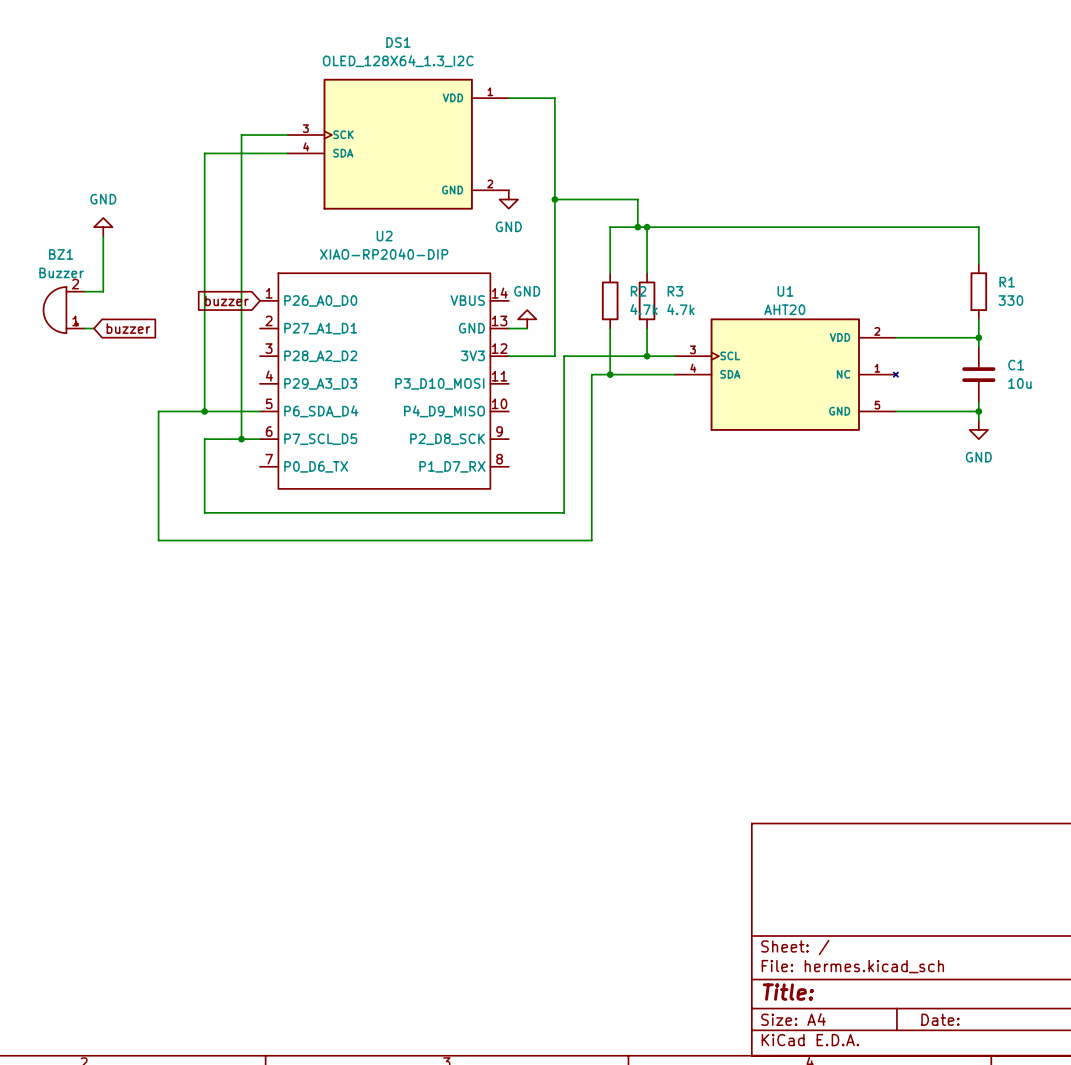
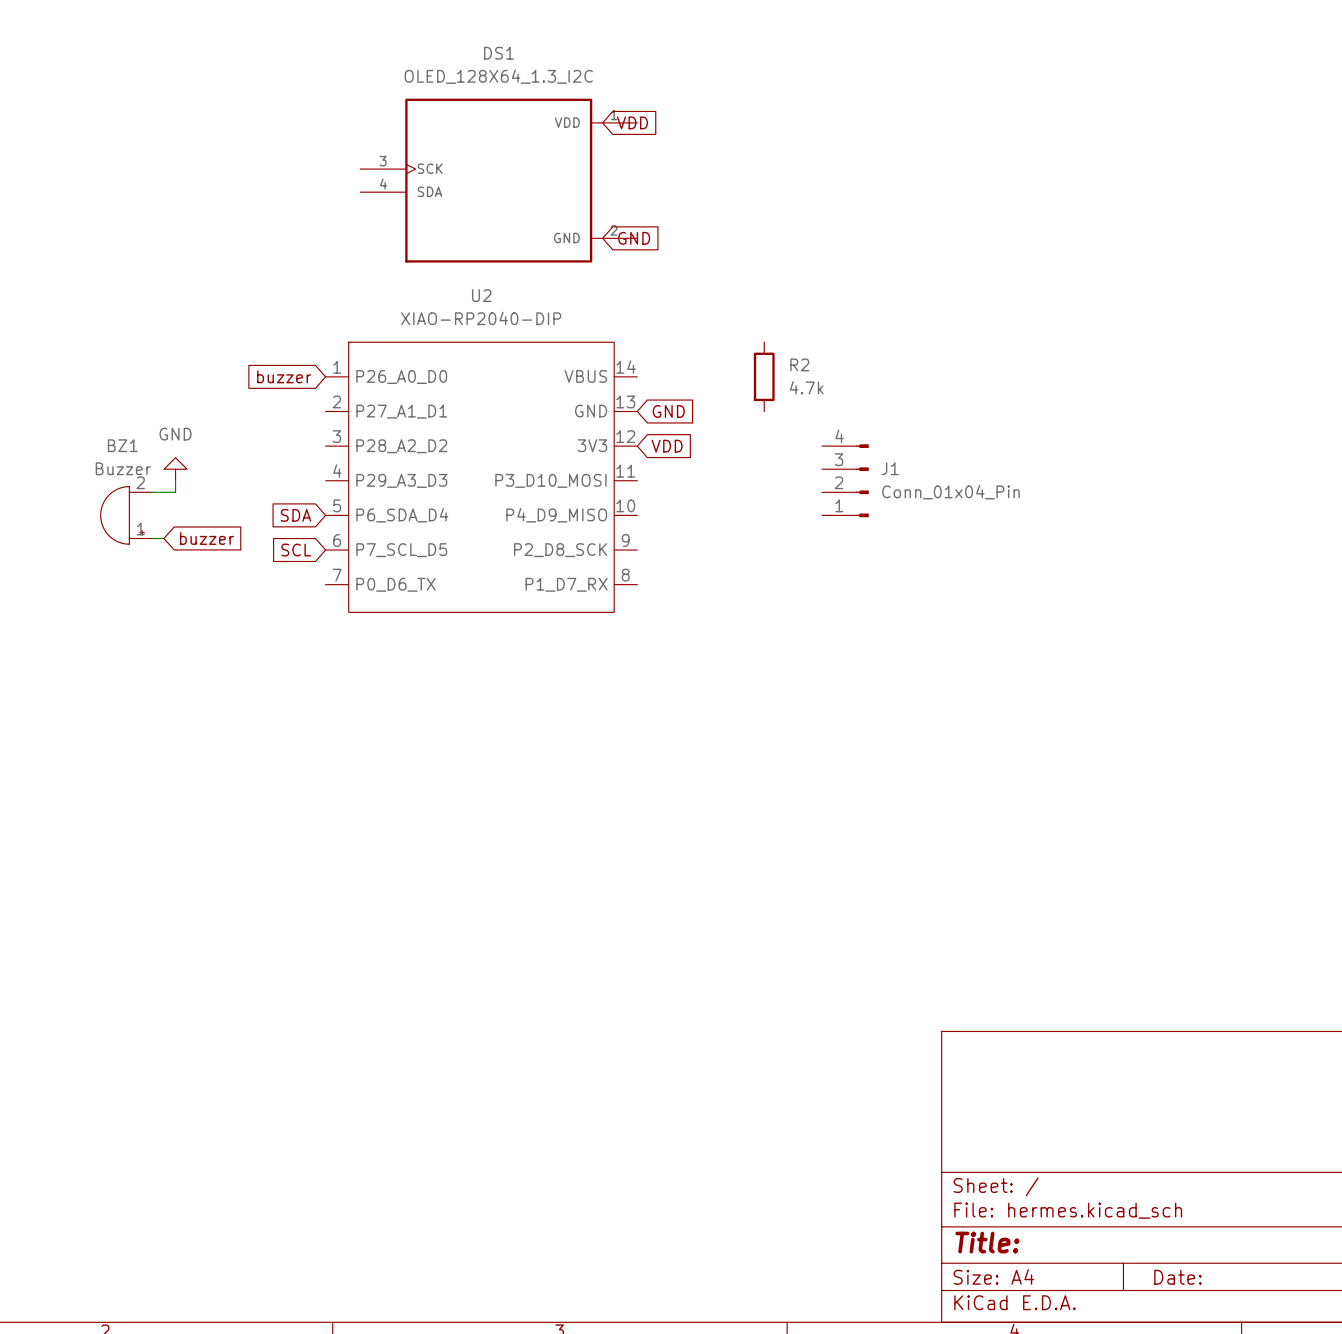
global label: none -> VDD (632, 122)
wire: (508, 98) (554, 98) (554, 356) (508, 356) -> none
wire: (287, 135) (241, 135) (241, 439) -> none
wire: (287, 153) (204, 153) (204, 411) -> none
global label: none -> GND (634, 238)
power symbol: GND (508, 199) -> none
wire: (554, 199) (637, 199) (637, 227) -> none
junction: (554, 199) -> none
power symbol position: GND (103, 227) -> GND (175, 469)
junction: (637, 227) -> none
wire: (647, 227) (647, 273) -> none
junction: (647, 227) -> none
wire: (103, 236) (103, 291) (84, 291) -> none
wire: (978, 264) (978, 227) (610, 227) (610, 273) -> none
R1: 330 (978, 291) -> none
R3: 4.7k (647, 300) -> none
BZ1 position: (64, 310) -> (126, 515)
power symbol: GND (527, 319) -> none
wire: (978, 319) (978, 346) -> none
wire: (84, 328) (94, 328) -> (152, 538) (164, 538)
global label position: buzzer (128, 328) -> buzzer (207, 538)
wire: (508, 328) (527, 328) -> none
global label: none -> GND (668, 411)
wire: (610, 328) (610, 374) -> none
wire: (647, 328) (647, 356) -> none
wire: (895, 337) (978, 337) -> none
junction: (978, 337) -> none
global label: none -> VDD (667, 446)
junction: (647, 356) -> none
wire: (674, 356) (564, 356) (564, 512) (204, 512) (204, 439) (259, 439) -> none
junction: (610, 374) -> none
wire: (674, 374) (591, 374) (591, 540) (158, 540) (158, 411) (259, 411) -> none
U1: AHT20 (786, 374) -> none
C1: 10u (978, 374) -> none
wire: none -> (175, 480) (175, 492) (152, 492)
J1: none -> Conn_01x04_Pin (845, 480)
wire: (978, 402) (978, 420) -> none
junction: (204, 411) -> none
global label: none -> SDA (296, 515)
wire: (895, 411) (978, 411) -> none
junction: (978, 411) -> none
power symbol: GND (978, 429) -> none
global label: none -> SCL (296, 550)
junction: (241, 439) -> none

